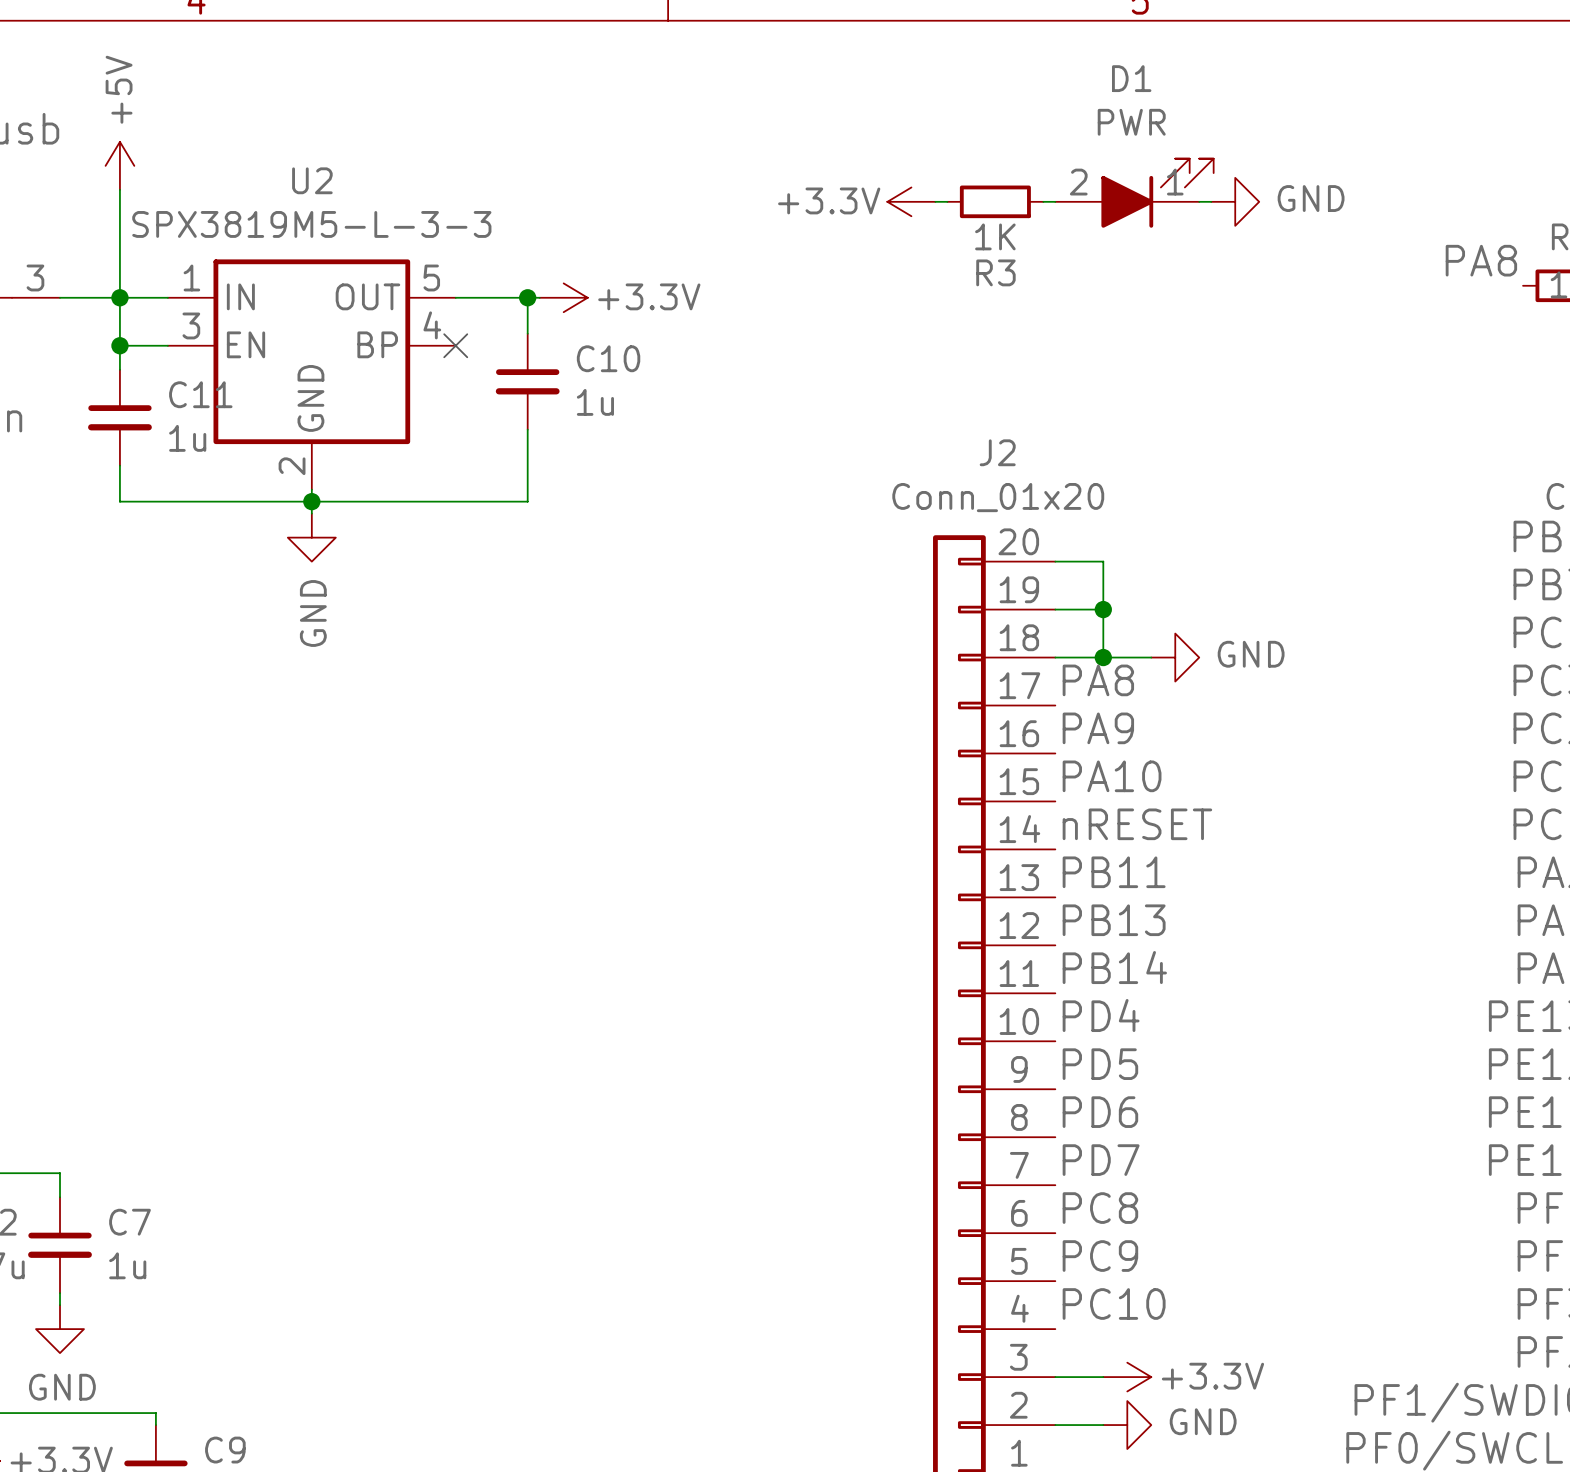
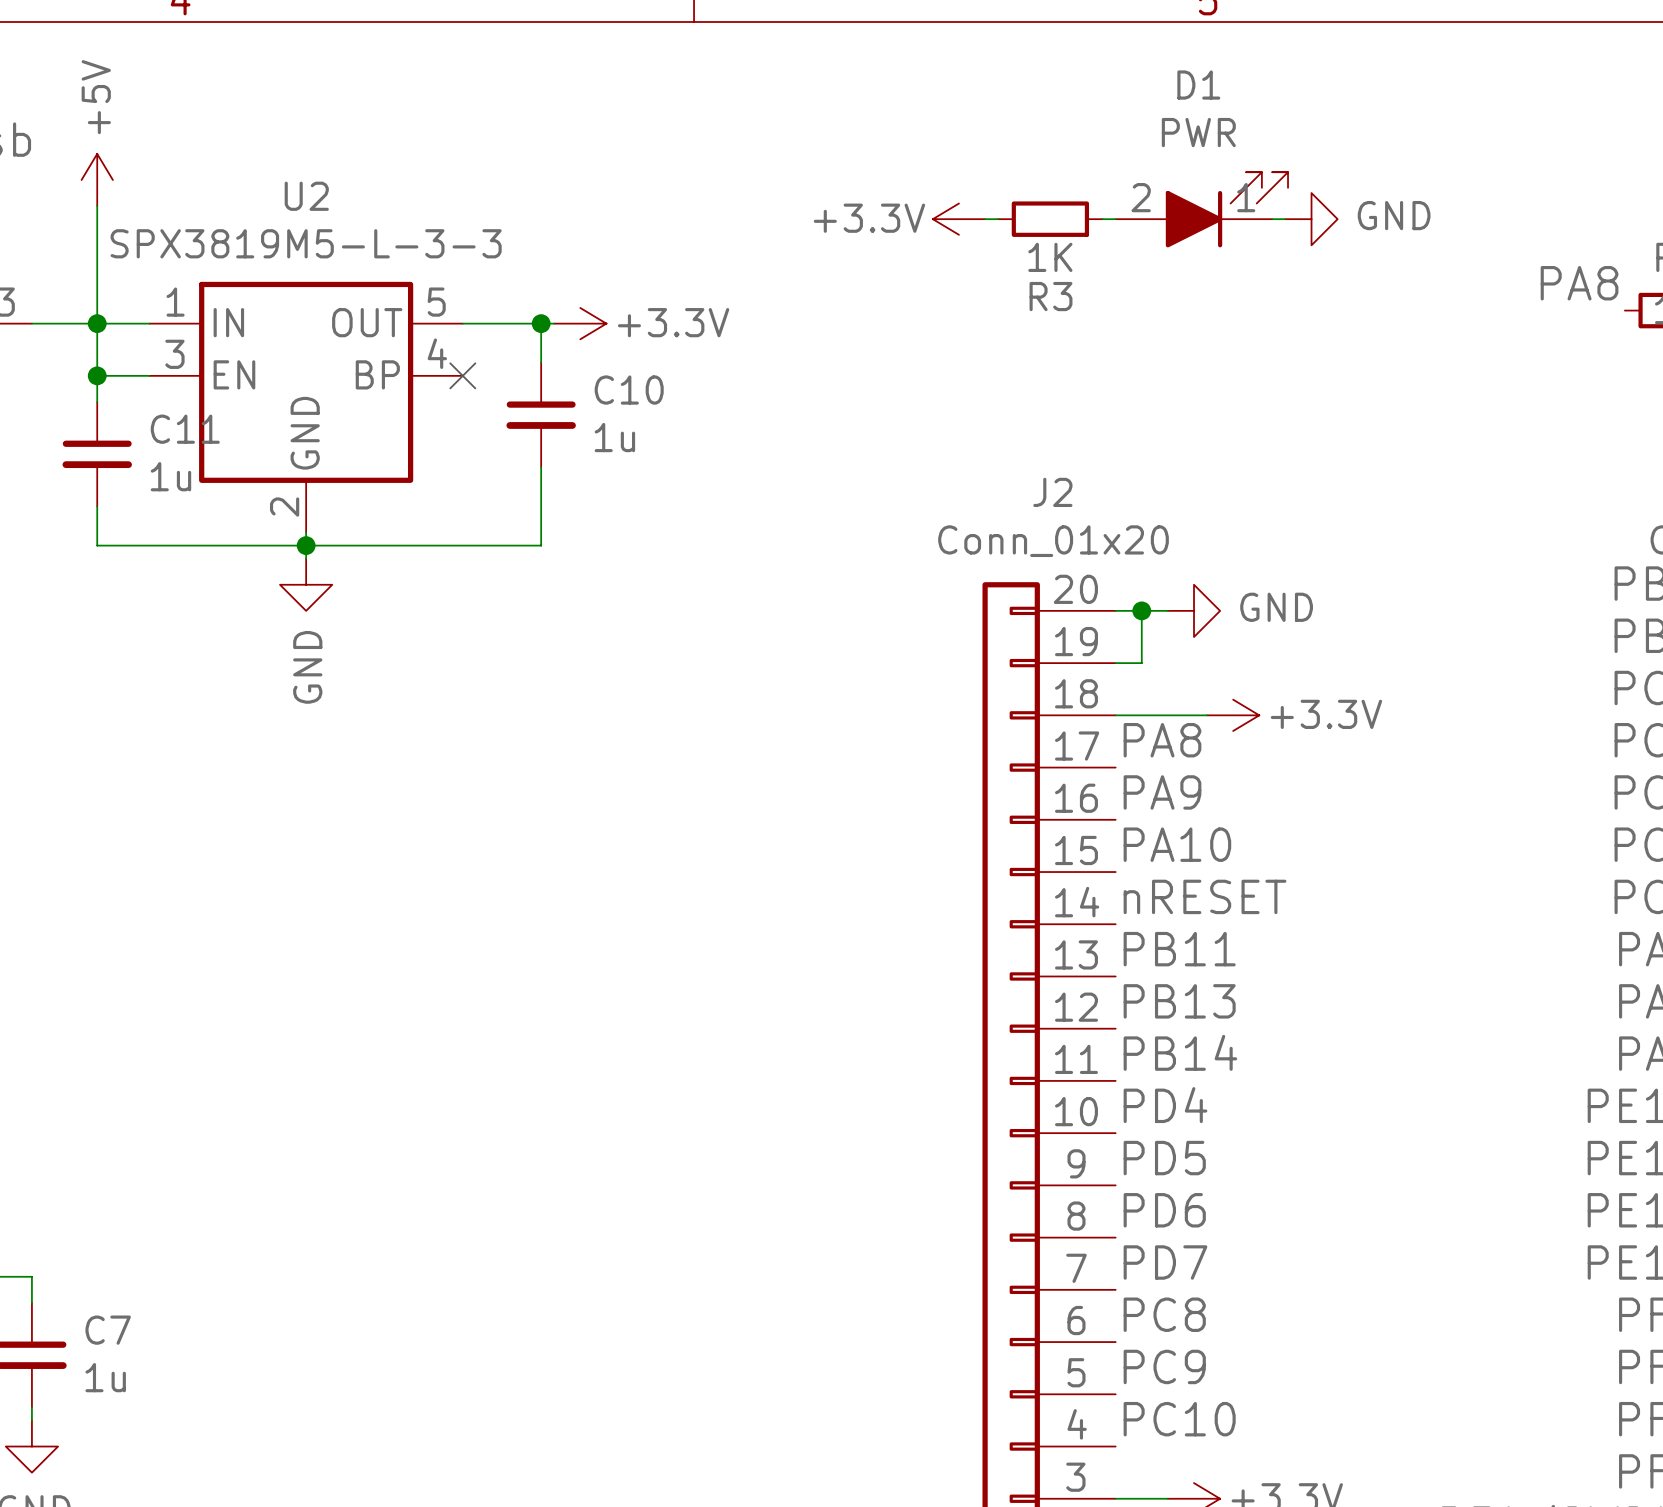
junction: none -> (1141, 610)
wire: (1103, 561) (1103, 657) -> none
power symbol: none -> GND (1194, 610)
wire: (1079, 609) (1103, 609) -> (1141, 663) (1141, 610)
junction: (1103, 609) -> none
junction: (1103, 657) -> none
power symbol: GND (1175, 657) -> +3.3V (1233, 715)

